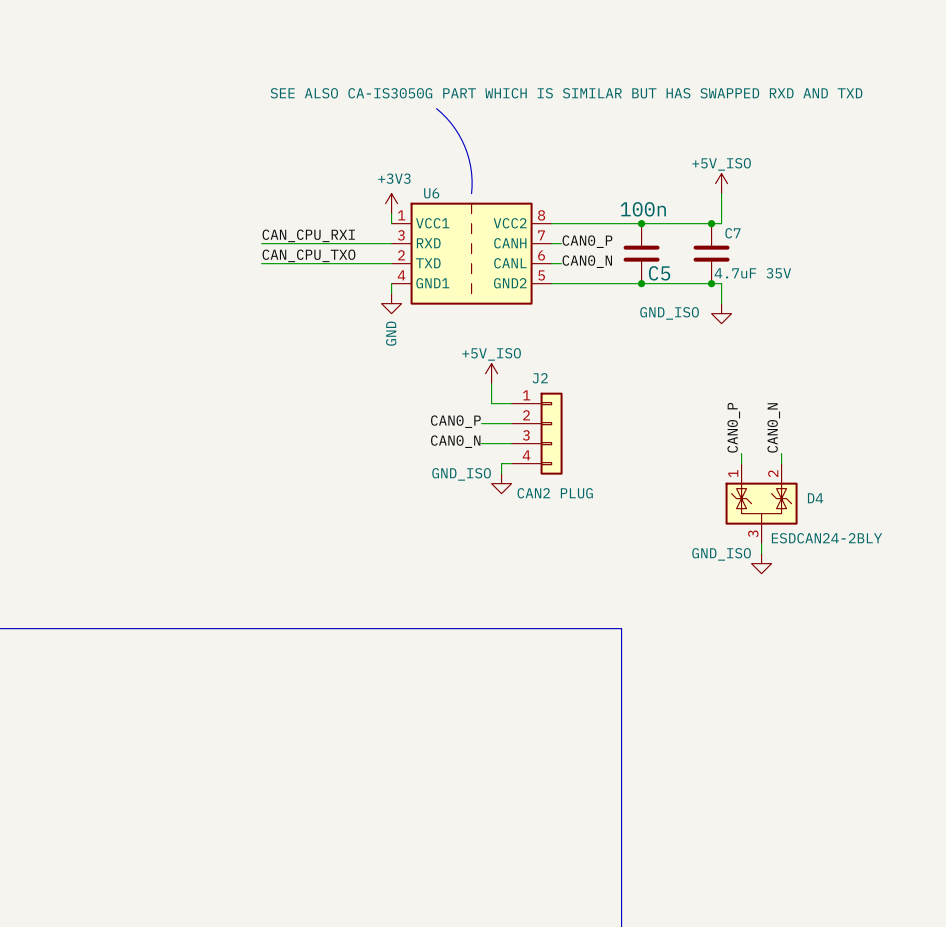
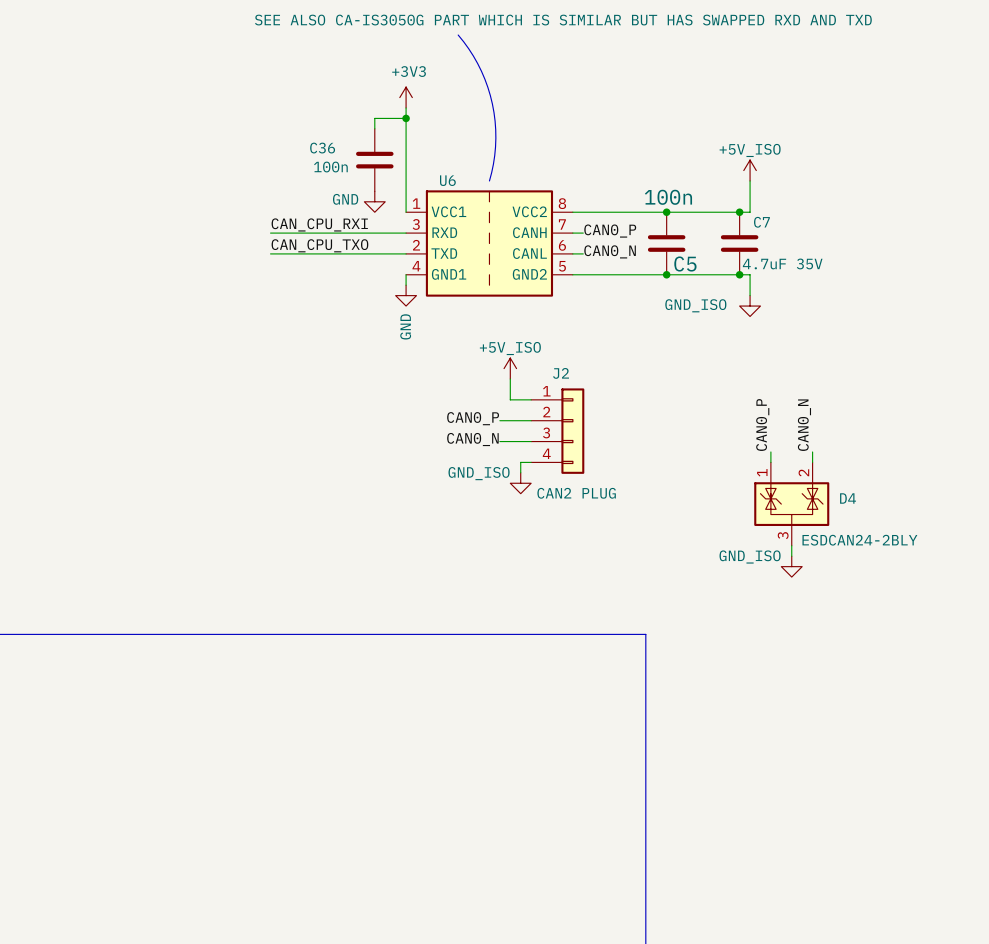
U6 text position: SEE ALSO CA-IS3050G PART WHICH IS SIMILAR BUT HAS SWAPPED RXD AND TXD (566, 93) -> SEE ALSO CA-IS3050G PART WHICH IS SIMILAR BUT HAS SWAPPED RXD AND TXD (563, 20)
line: (436, 108) (451, 123) (464, 146) (471, 173) (471, 193) -> (458, 35) (481, 71) (492, 104) (495, 138) (489, 180)
wire: none -> (406, 107) (406, 201)
wire: none -> (406, 118) (374, 118) (374, 128)
junction: none -> (406, 118)
C36: none -> 100n (374, 160)
power symbol position: +3V3 (391, 203) -> +3V3 (406, 97)
power symbol: none -> GND (374, 201)

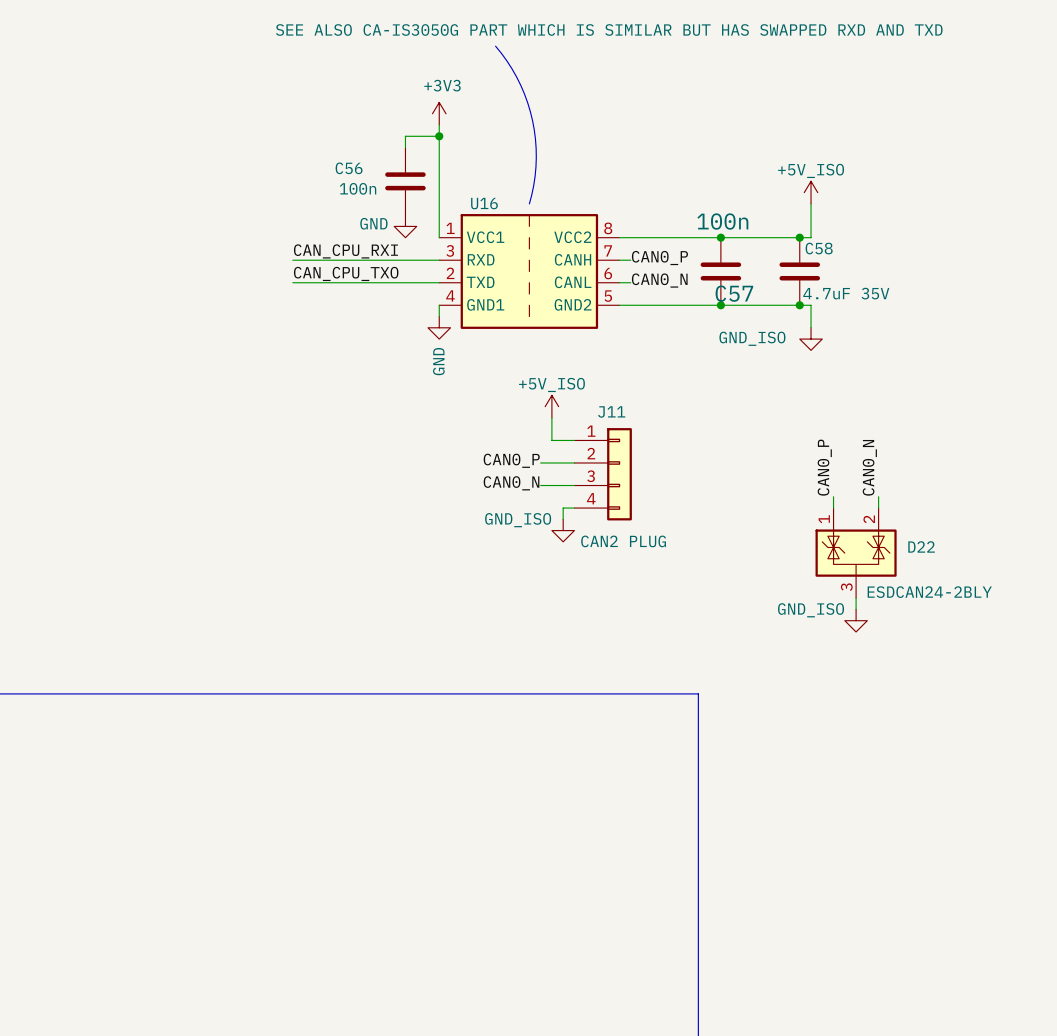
C36 name: C36 (322, 148) -> C56 (349, 168)
U6 name: U6 (447, 180) -> U16 (484, 203)
C7 name: C7 (761, 222) -> C58 (819, 248)
C5 name: C5 (685, 264) -> C57 (734, 293)
J2 name: J2 (561, 373) -> J11 (611, 411)
D4 name: D4 (848, 498) -> D22 (921, 546)

